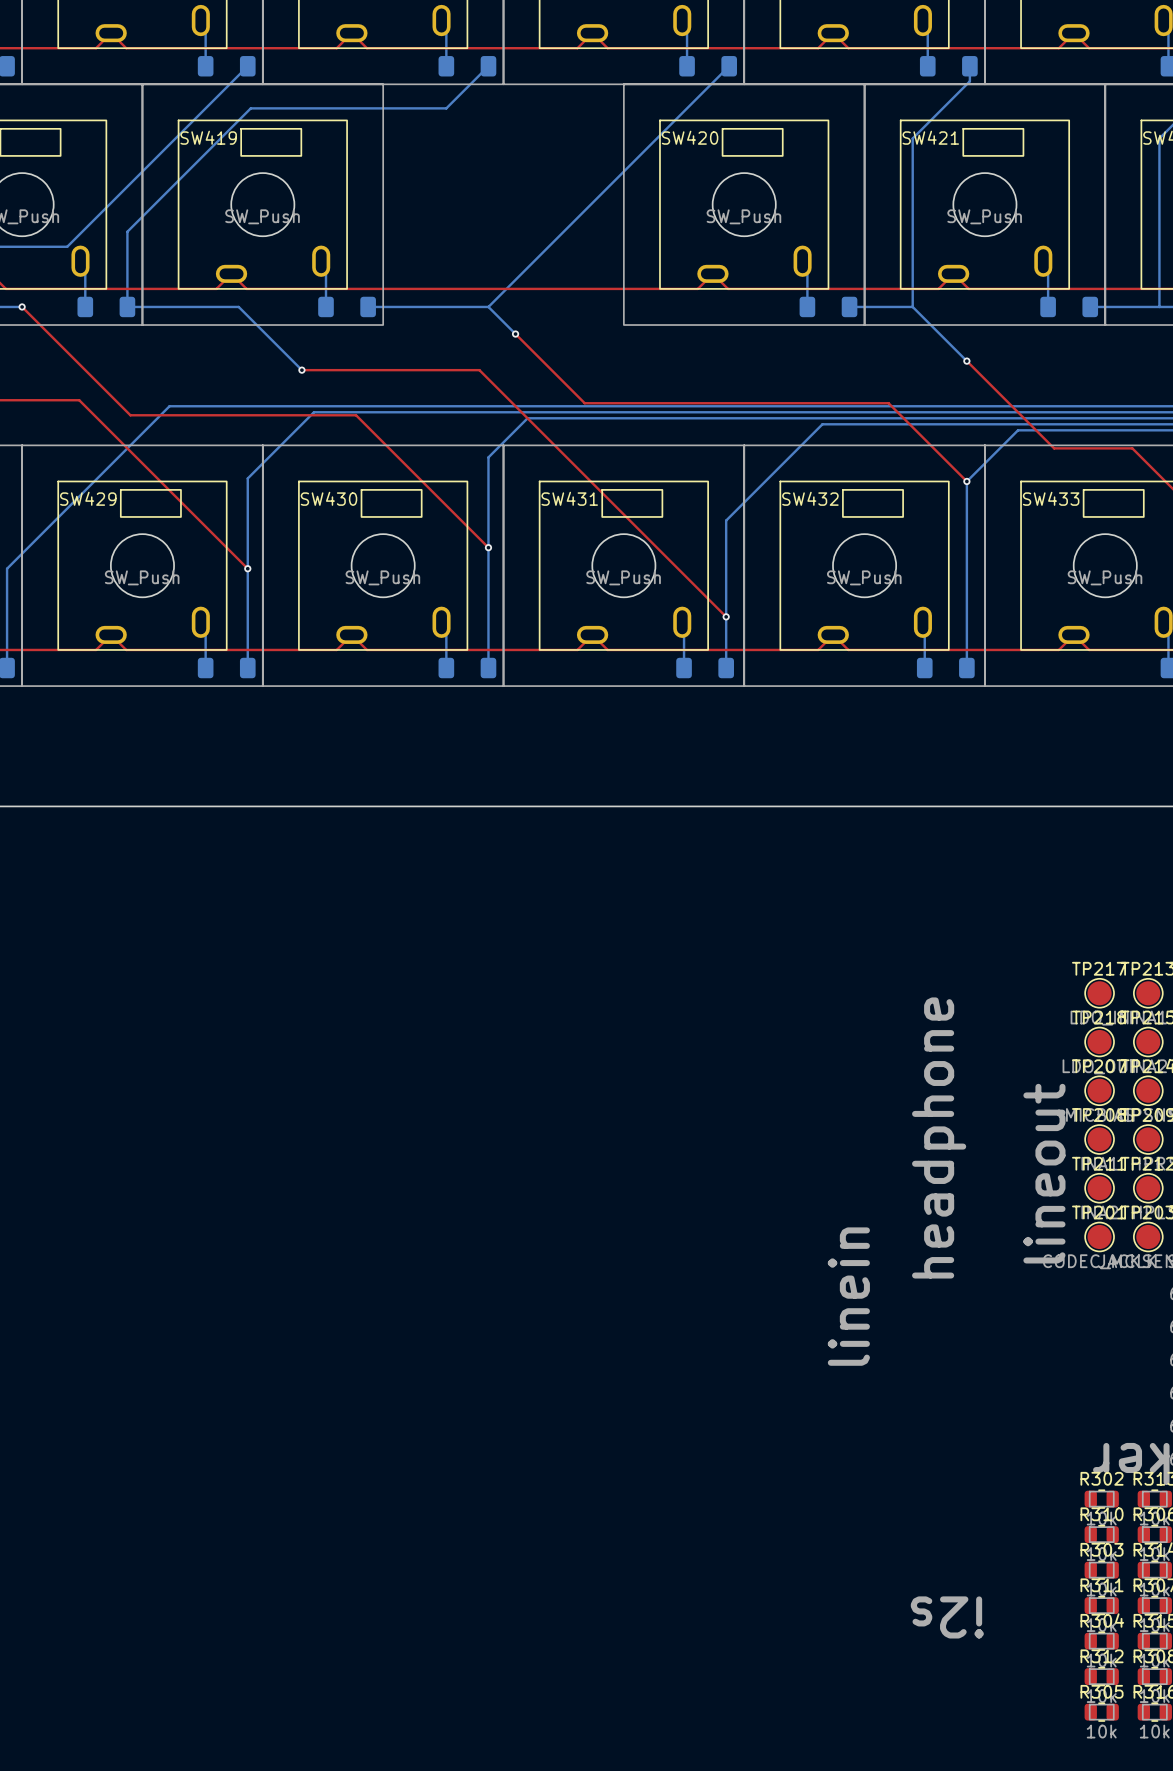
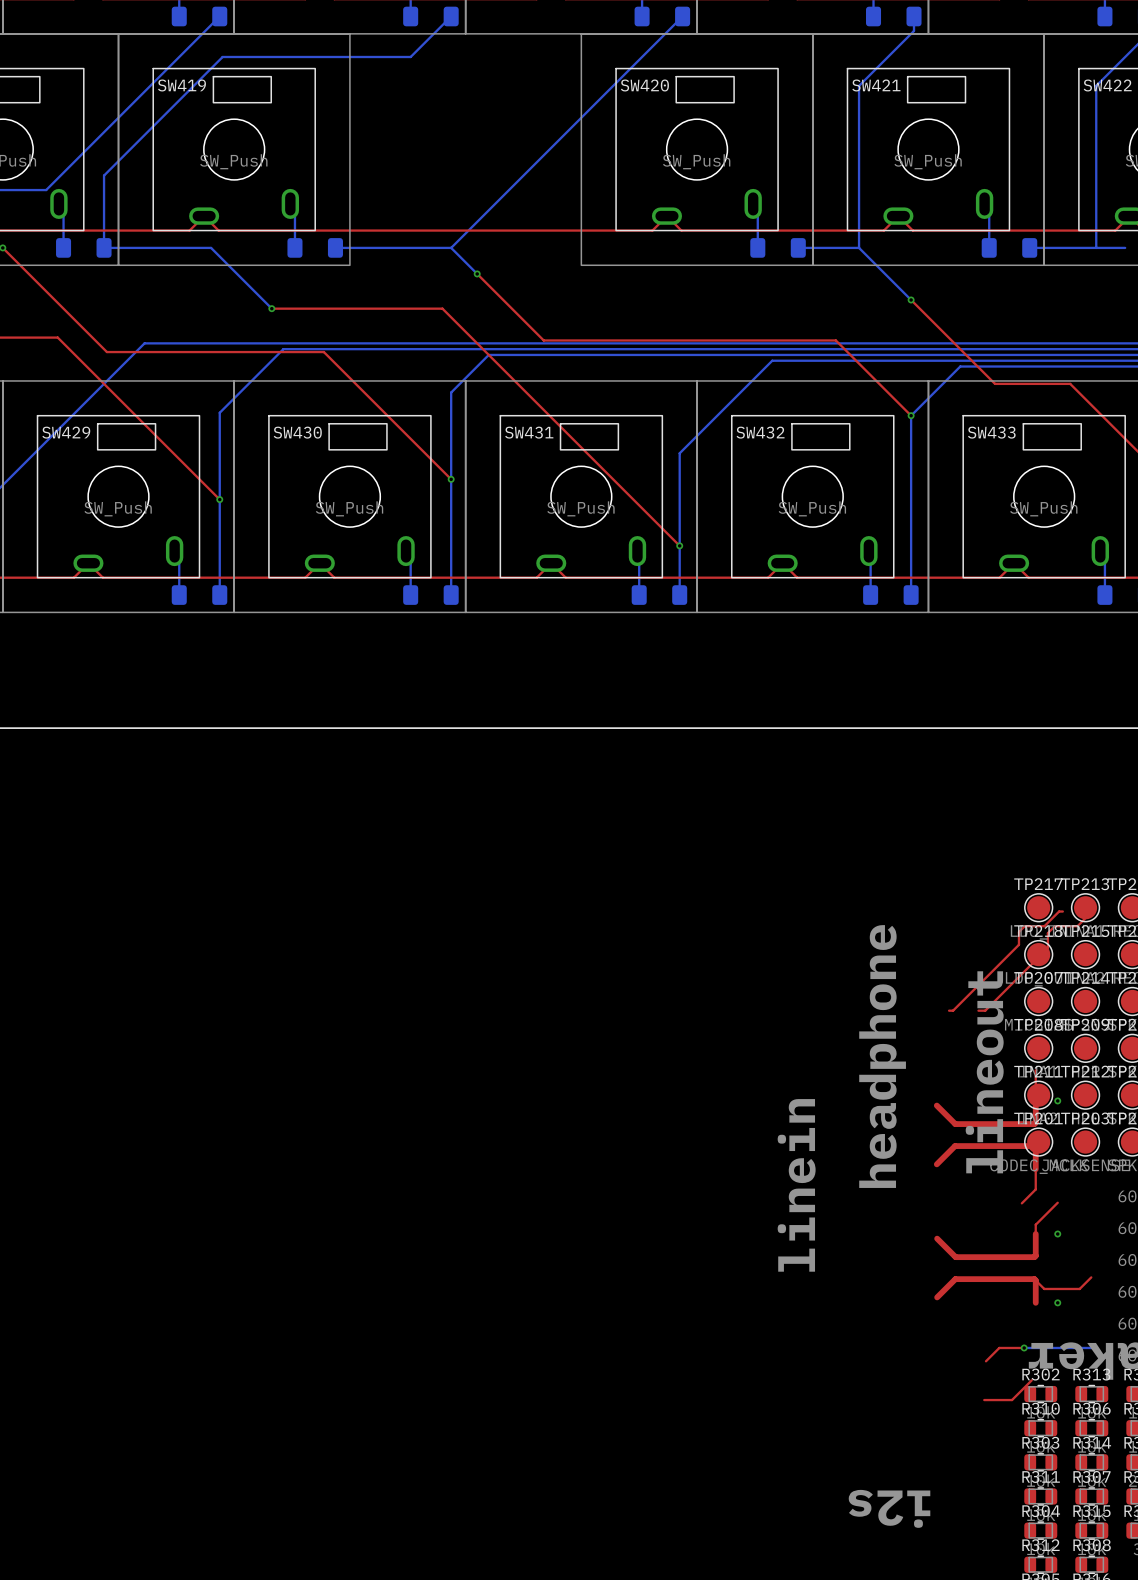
top track: none -> (1062, 911) (1059, 911) (1044, 926) (1024, 926) (1018, 932) (1018, 944) (953, 1010) (949, 1010)
top track: none -> (1092, 911) (1077, 926) (1054, 926) (1047, 933) (1047, 948) (985, 1010) (978, 1010)
top track: none -> (1036, 1070) (1034, 1124) (955, 1124) (936, 1105)
via: none -> (1057, 1100)
top track: none -> (936, 1164) (955, 1146) (1034, 1146) (1035, 1189) (1021, 1203)
top track: none -> (1057, 1202) (1035, 1224) (1034, 1257) (955, 1257) (937, 1238)
via: none -> (1057, 1234)
top track: none -> (1091, 1277) (1079, 1288) (1044, 1288) (1034, 1279)
top track: none -> (1034, 1279) (1035, 1302)
top track: none -> (1034, 1279) (955, 1279) (937, 1297)
via: none -> (1057, 1302)
bottom track: none -> (1091, 1347) (1024, 1347)
top track: none -> (1024, 1347) (999, 1347) (986, 1361)
via: none -> (1024, 1347)
top track: none -> (1031, 1380) (1012, 1400) (984, 1400)

